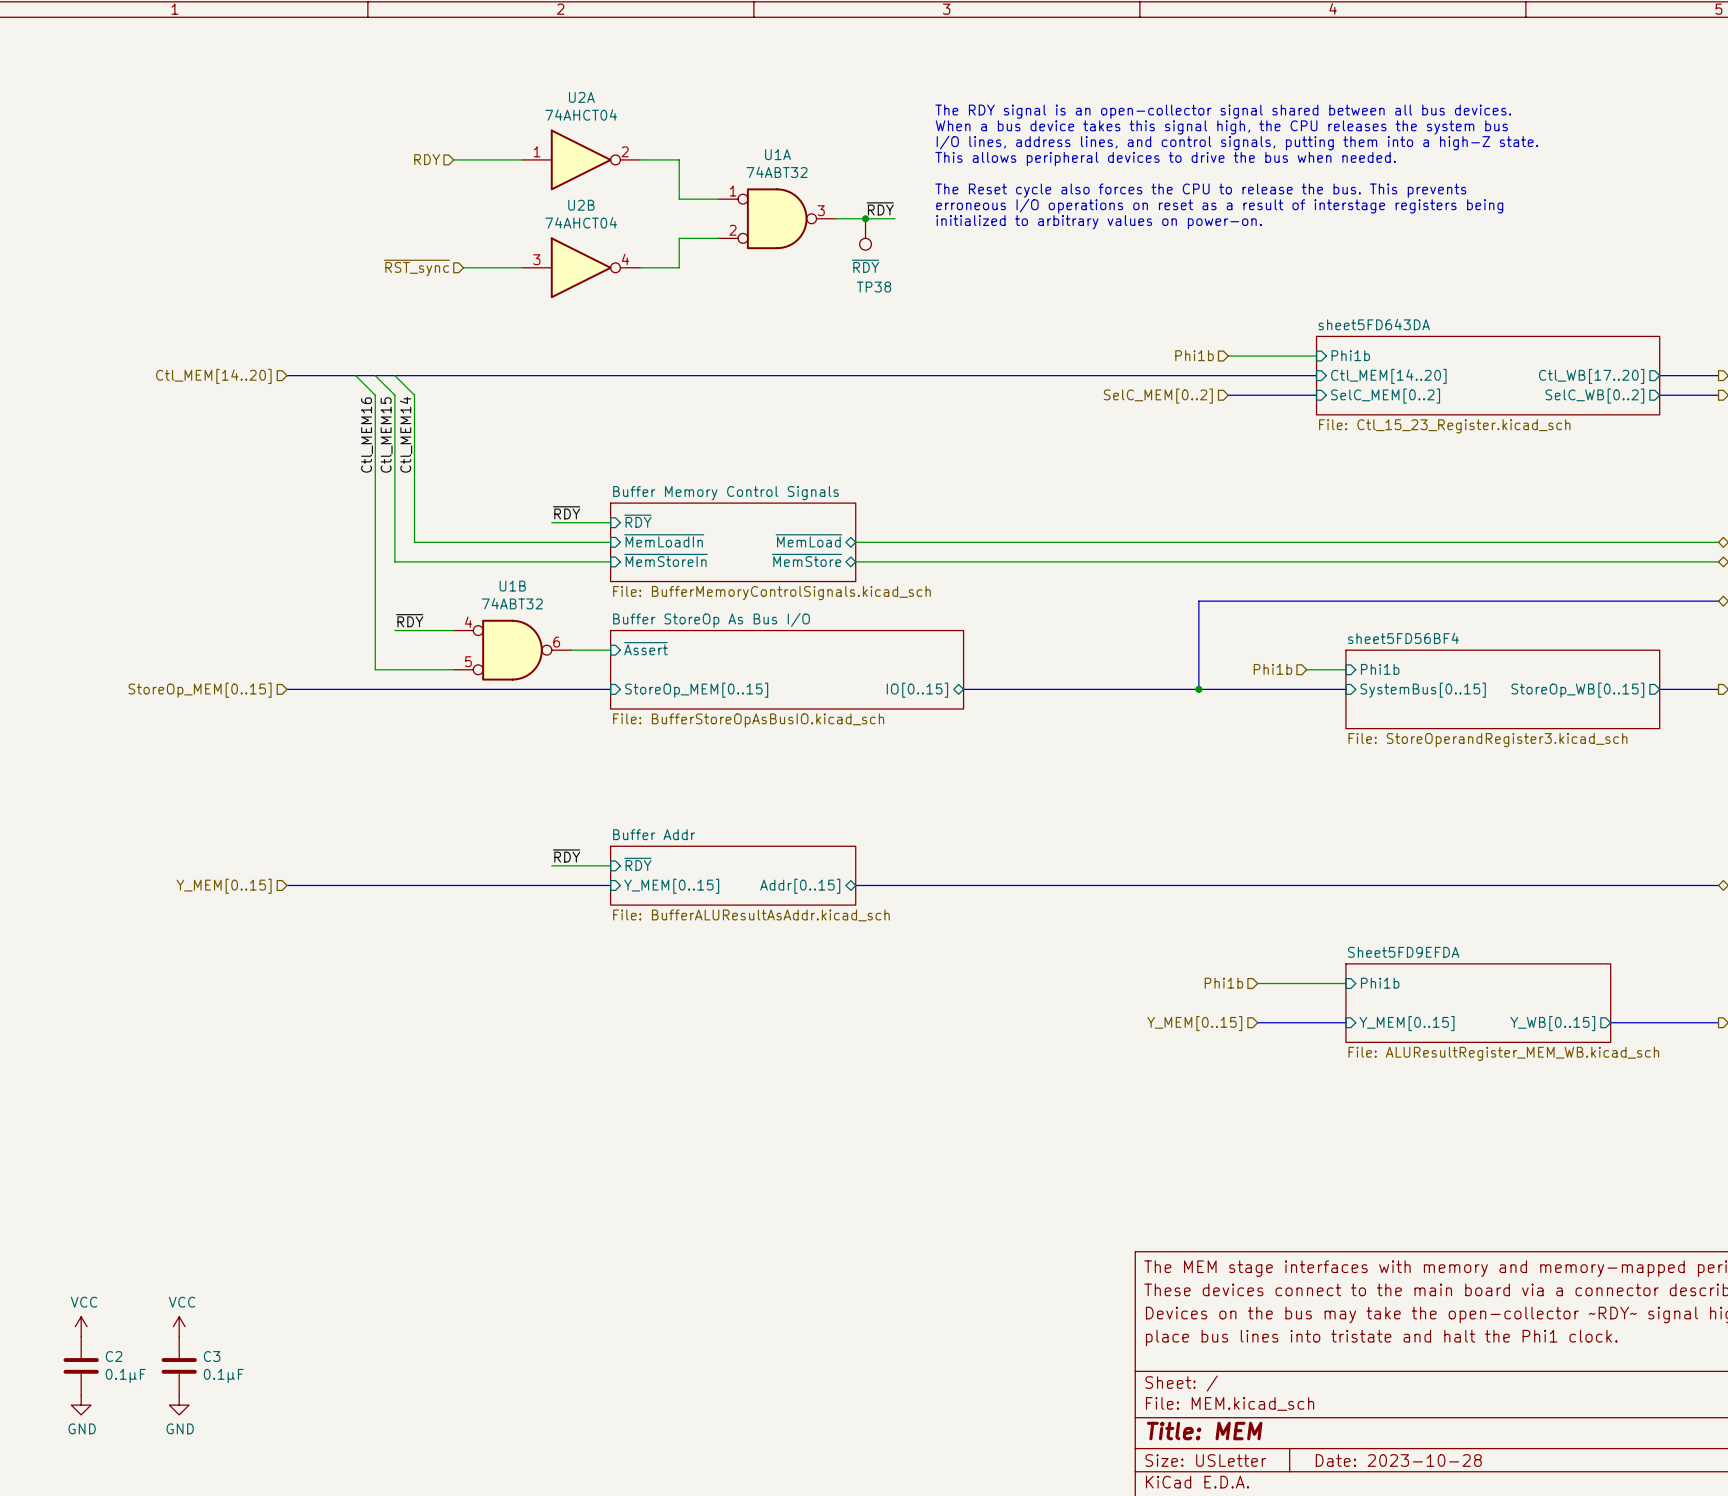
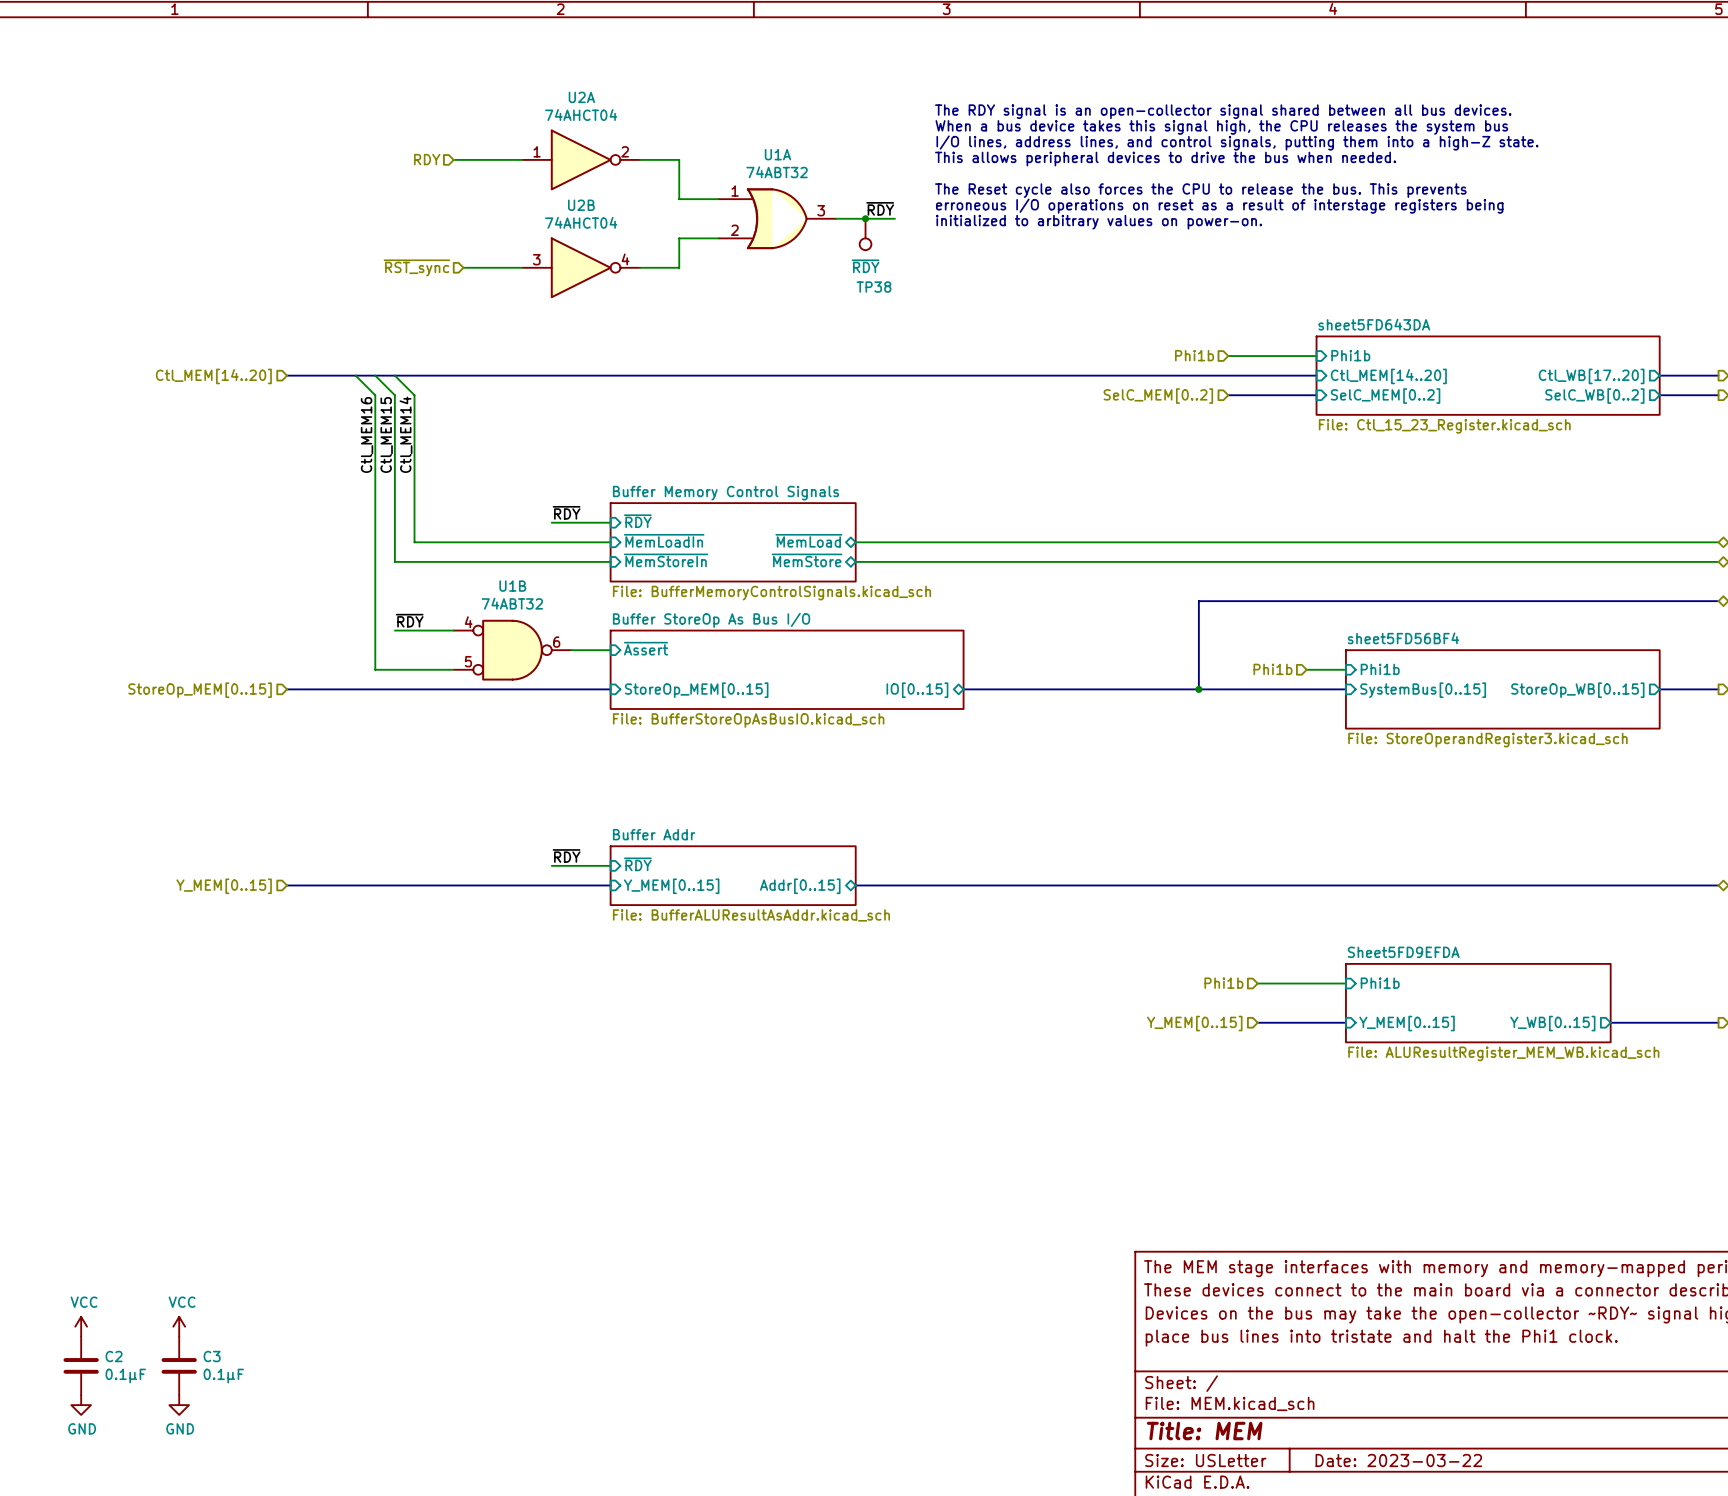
U1A symbol: [718, 188, 837, 250] -> [718, 188, 837, 250]
title block: Date: 2023-10-28 (1398, 1460) -> Date: 2023-03-22 (1398, 1460)

